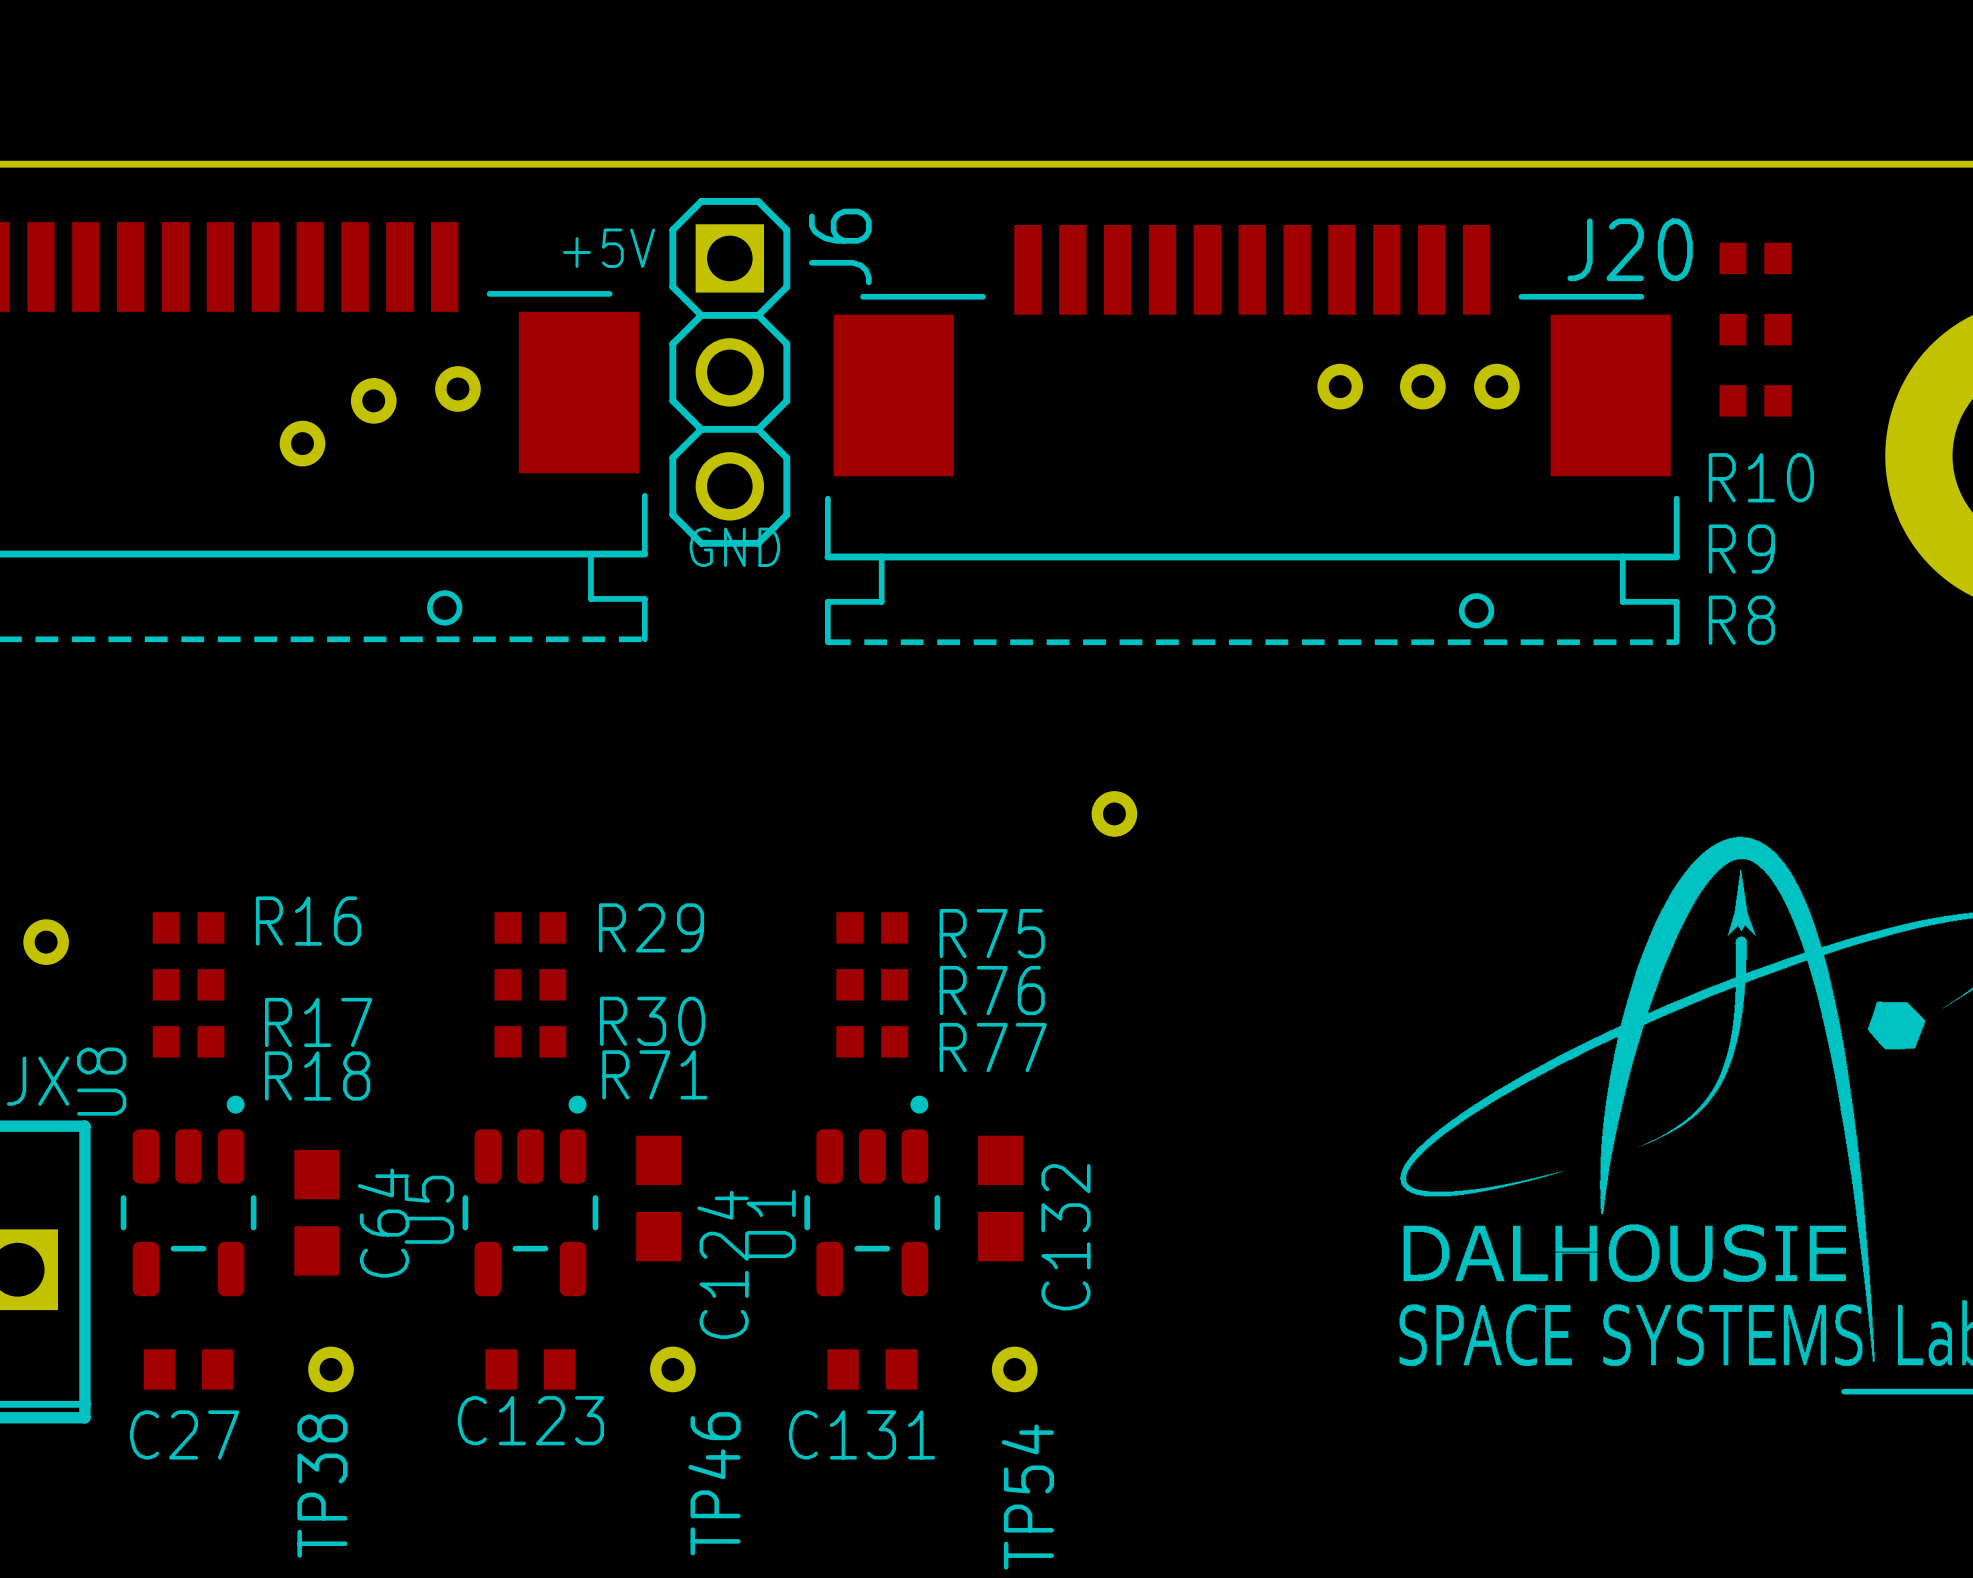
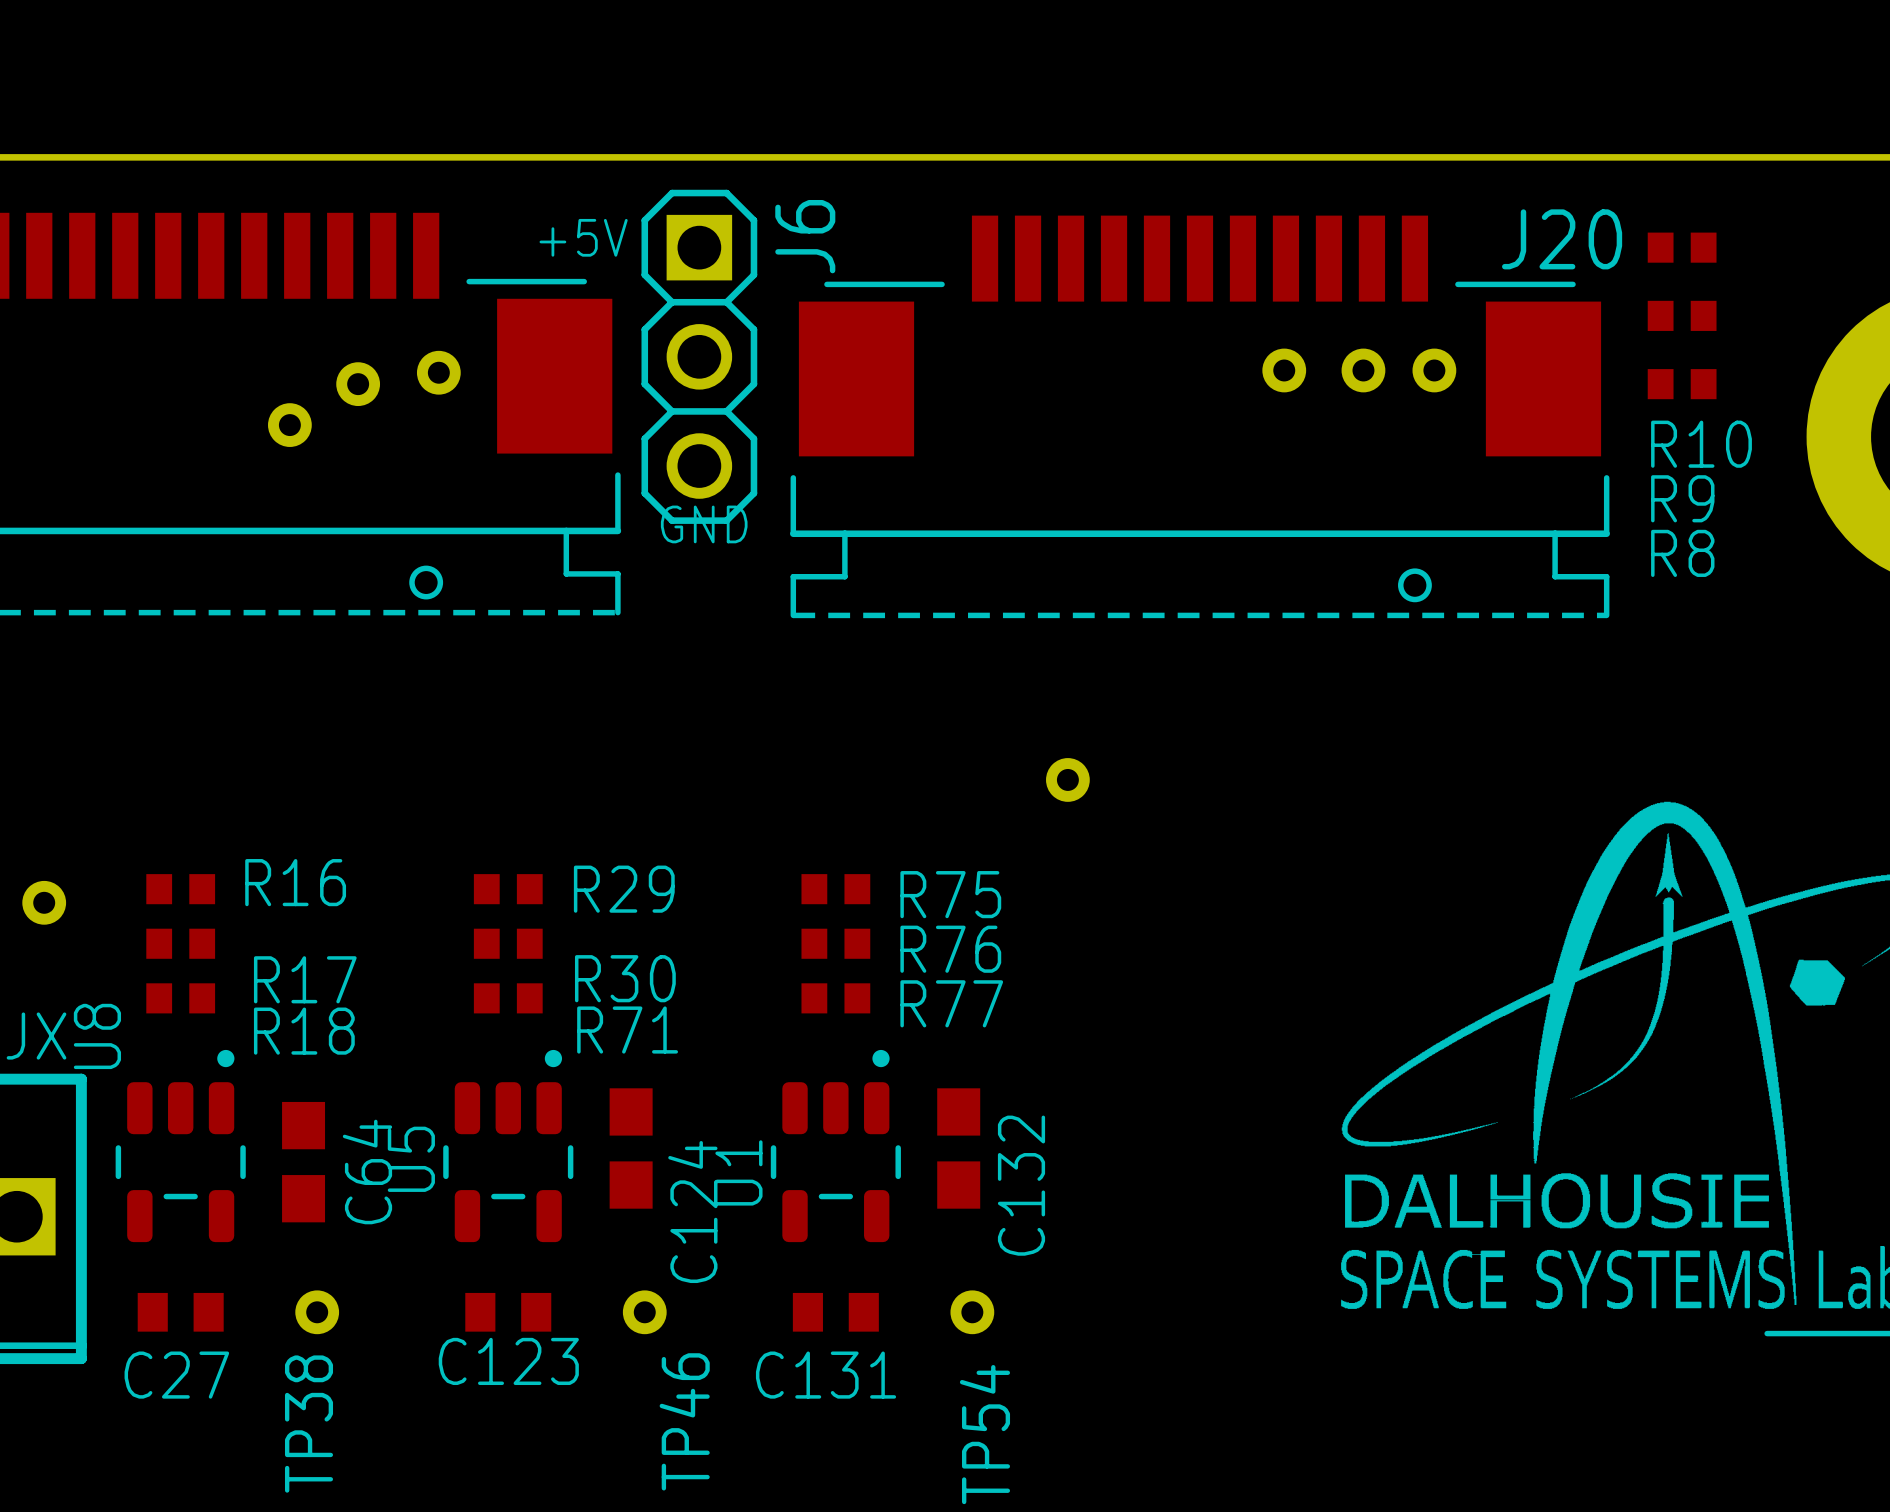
R10 name position: R10 (1761, 477) -> R10 (1701, 444)
R9 name position: R9 (1741, 549) -> R9 (1682, 498)
R8 name position: R8 (1741, 620) -> R8 (1682, 553)

